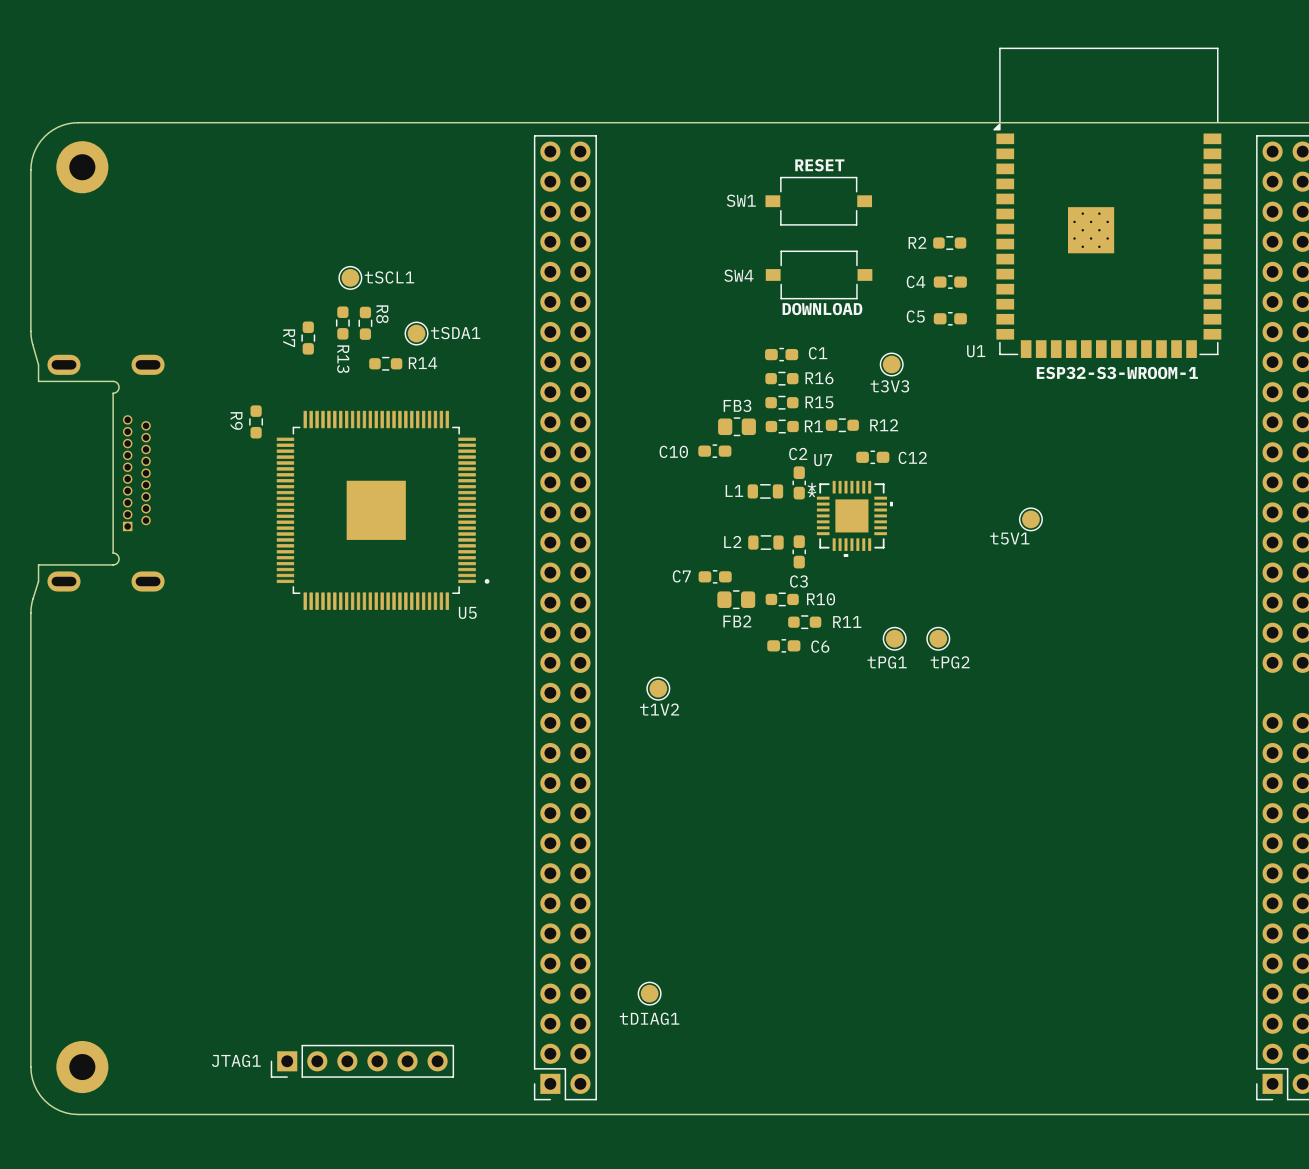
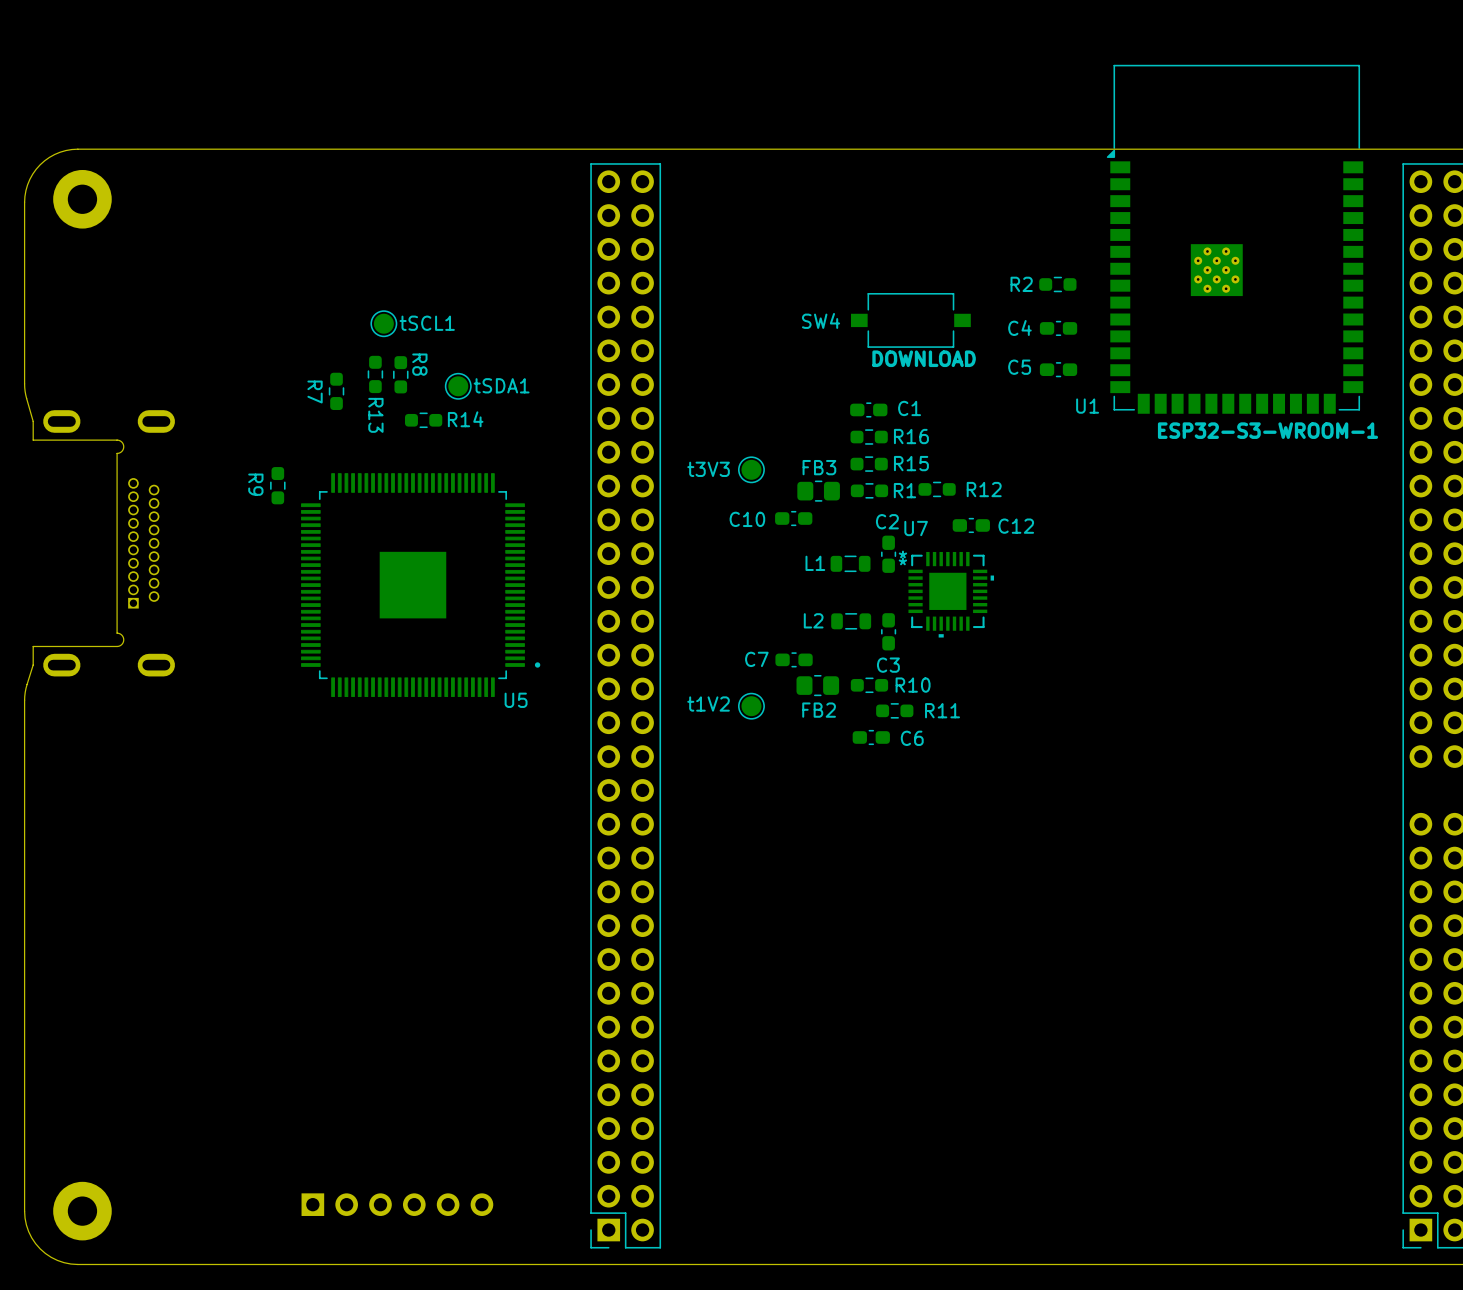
text: RESET (819, 165) -> none
SW1: (818, 201) -> none
t3V3 position: (891, 364) -> (751, 469)
t3V3 name position: t3V3 (889, 386) -> t3V3 (708, 469)
t5V1: (1030, 519) -> none
tPG1: (894, 638) -> none
tPG2: (938, 638) -> none
t1V2 position: (658, 688) -> (751, 706)
t1V2 name position: t1V2 (659, 709) -> t1V2 (708, 704)
tDIAG1: (649, 993) -> none
JTAG1 side: bottom (362, 1061) -> top (397, 1204)

